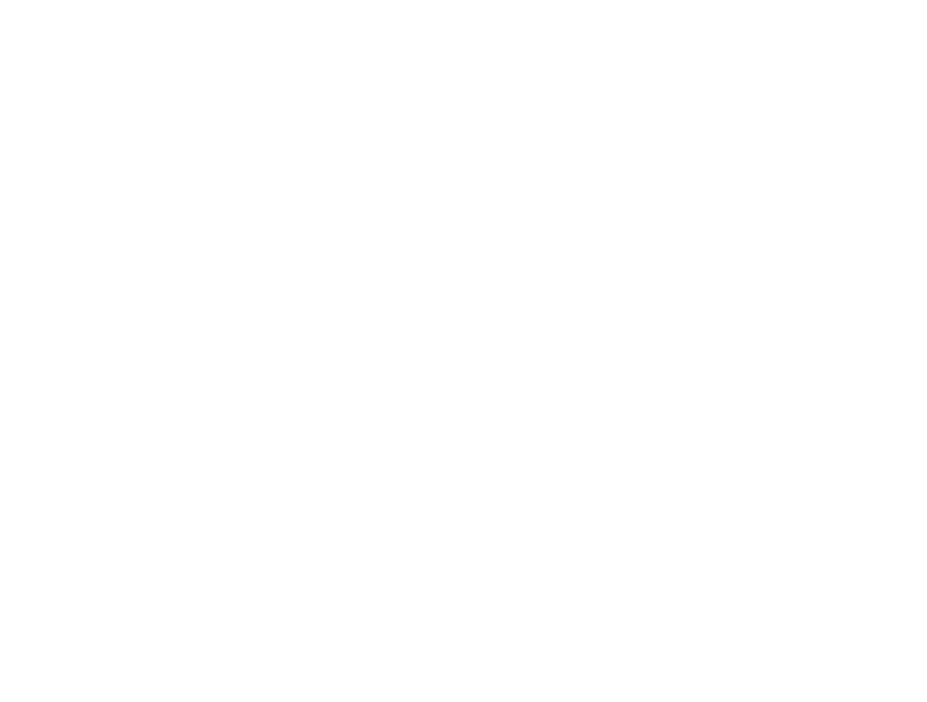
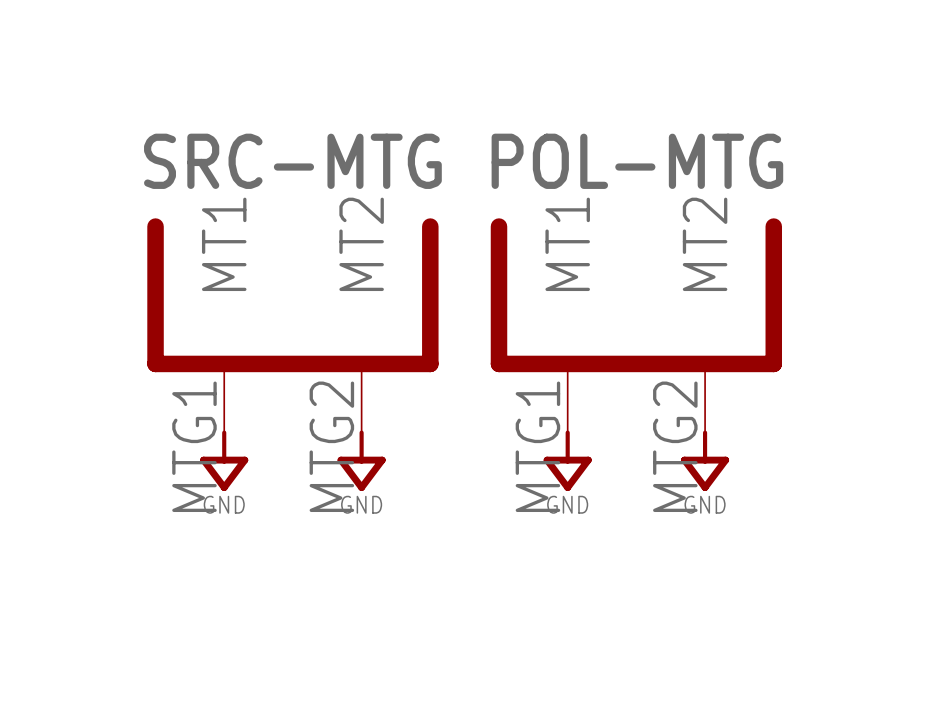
SRC-MTG: none -> (292, 325)
POL-MTG: none -> (636, 325)
power symbol: none -> GND (224, 460)
power symbol: none -> GND (361, 460)
power symbol: none -> GND (567, 460)
power symbol: none -> GND (705, 460)

